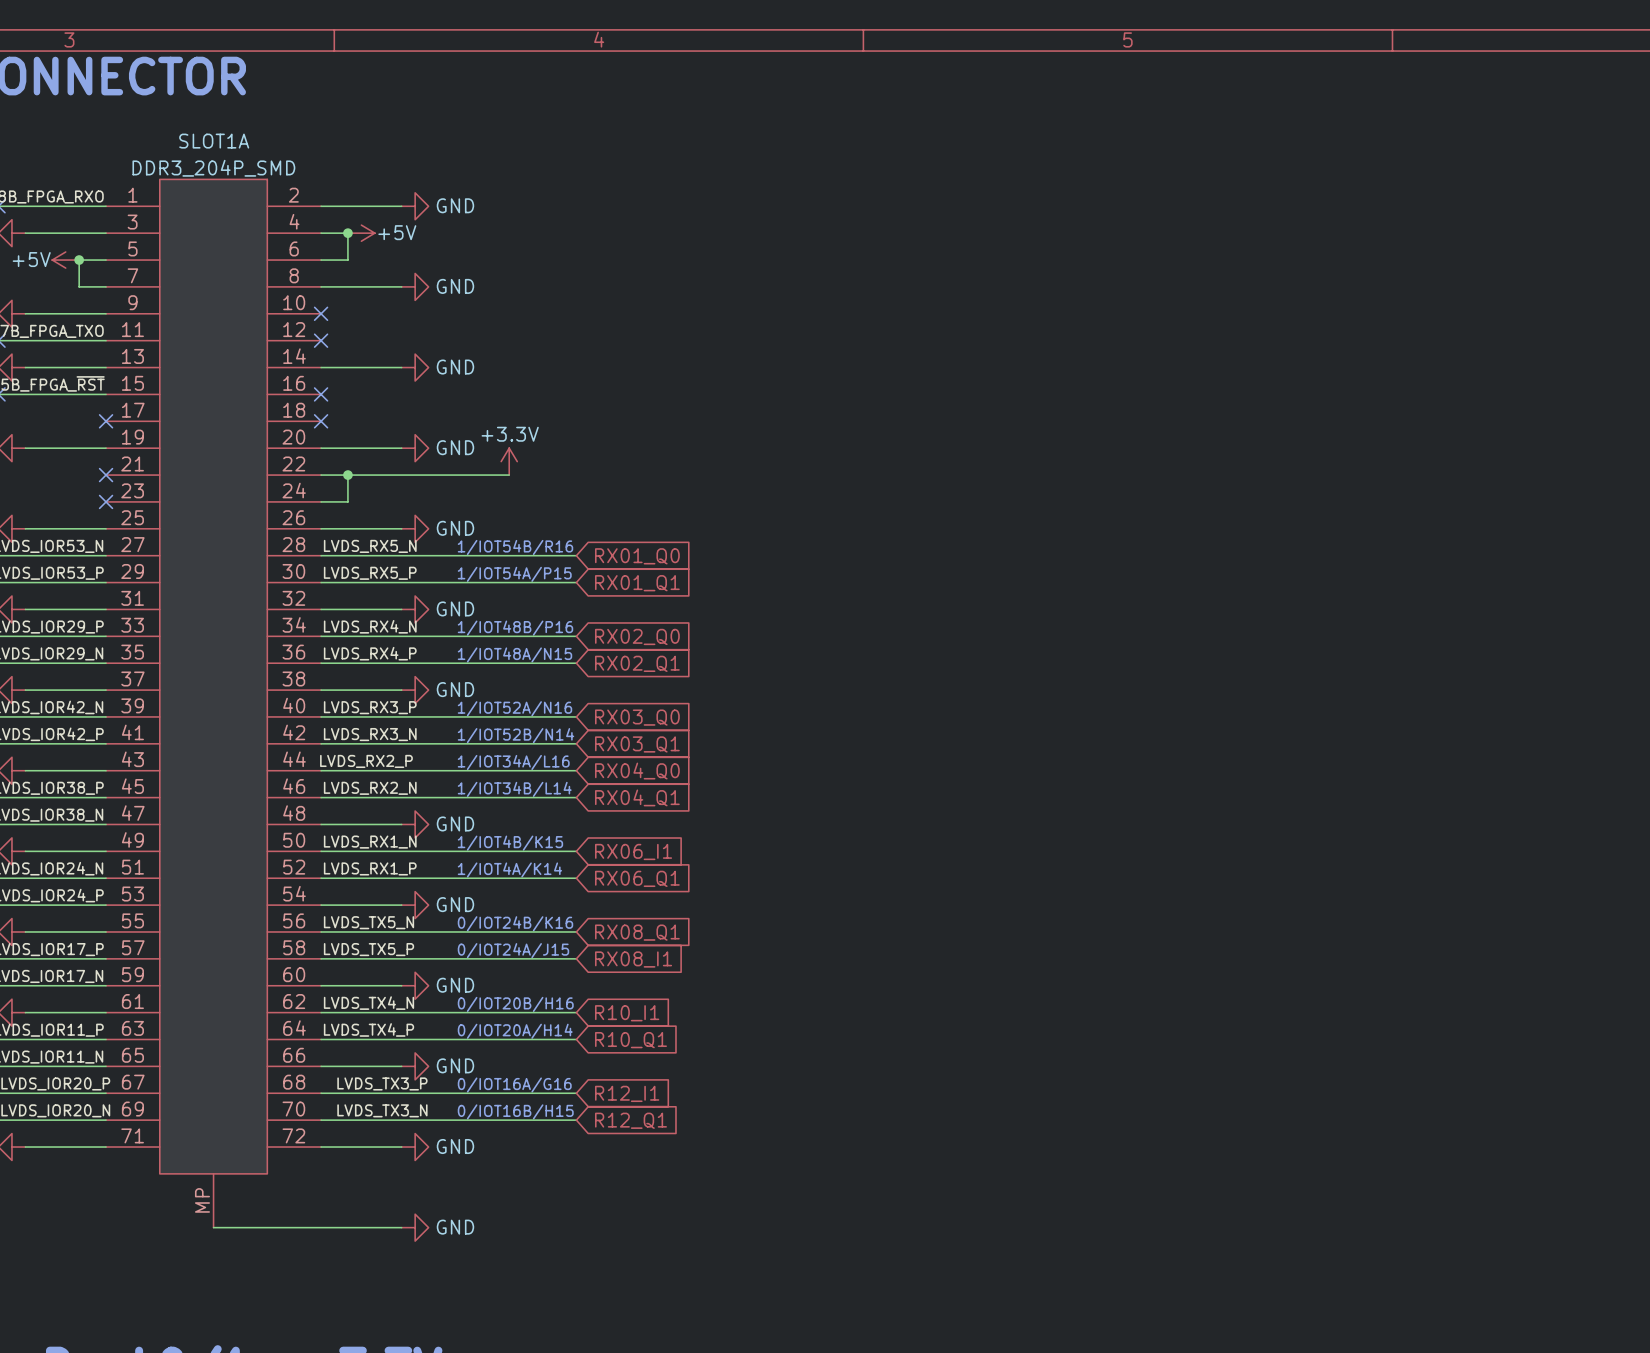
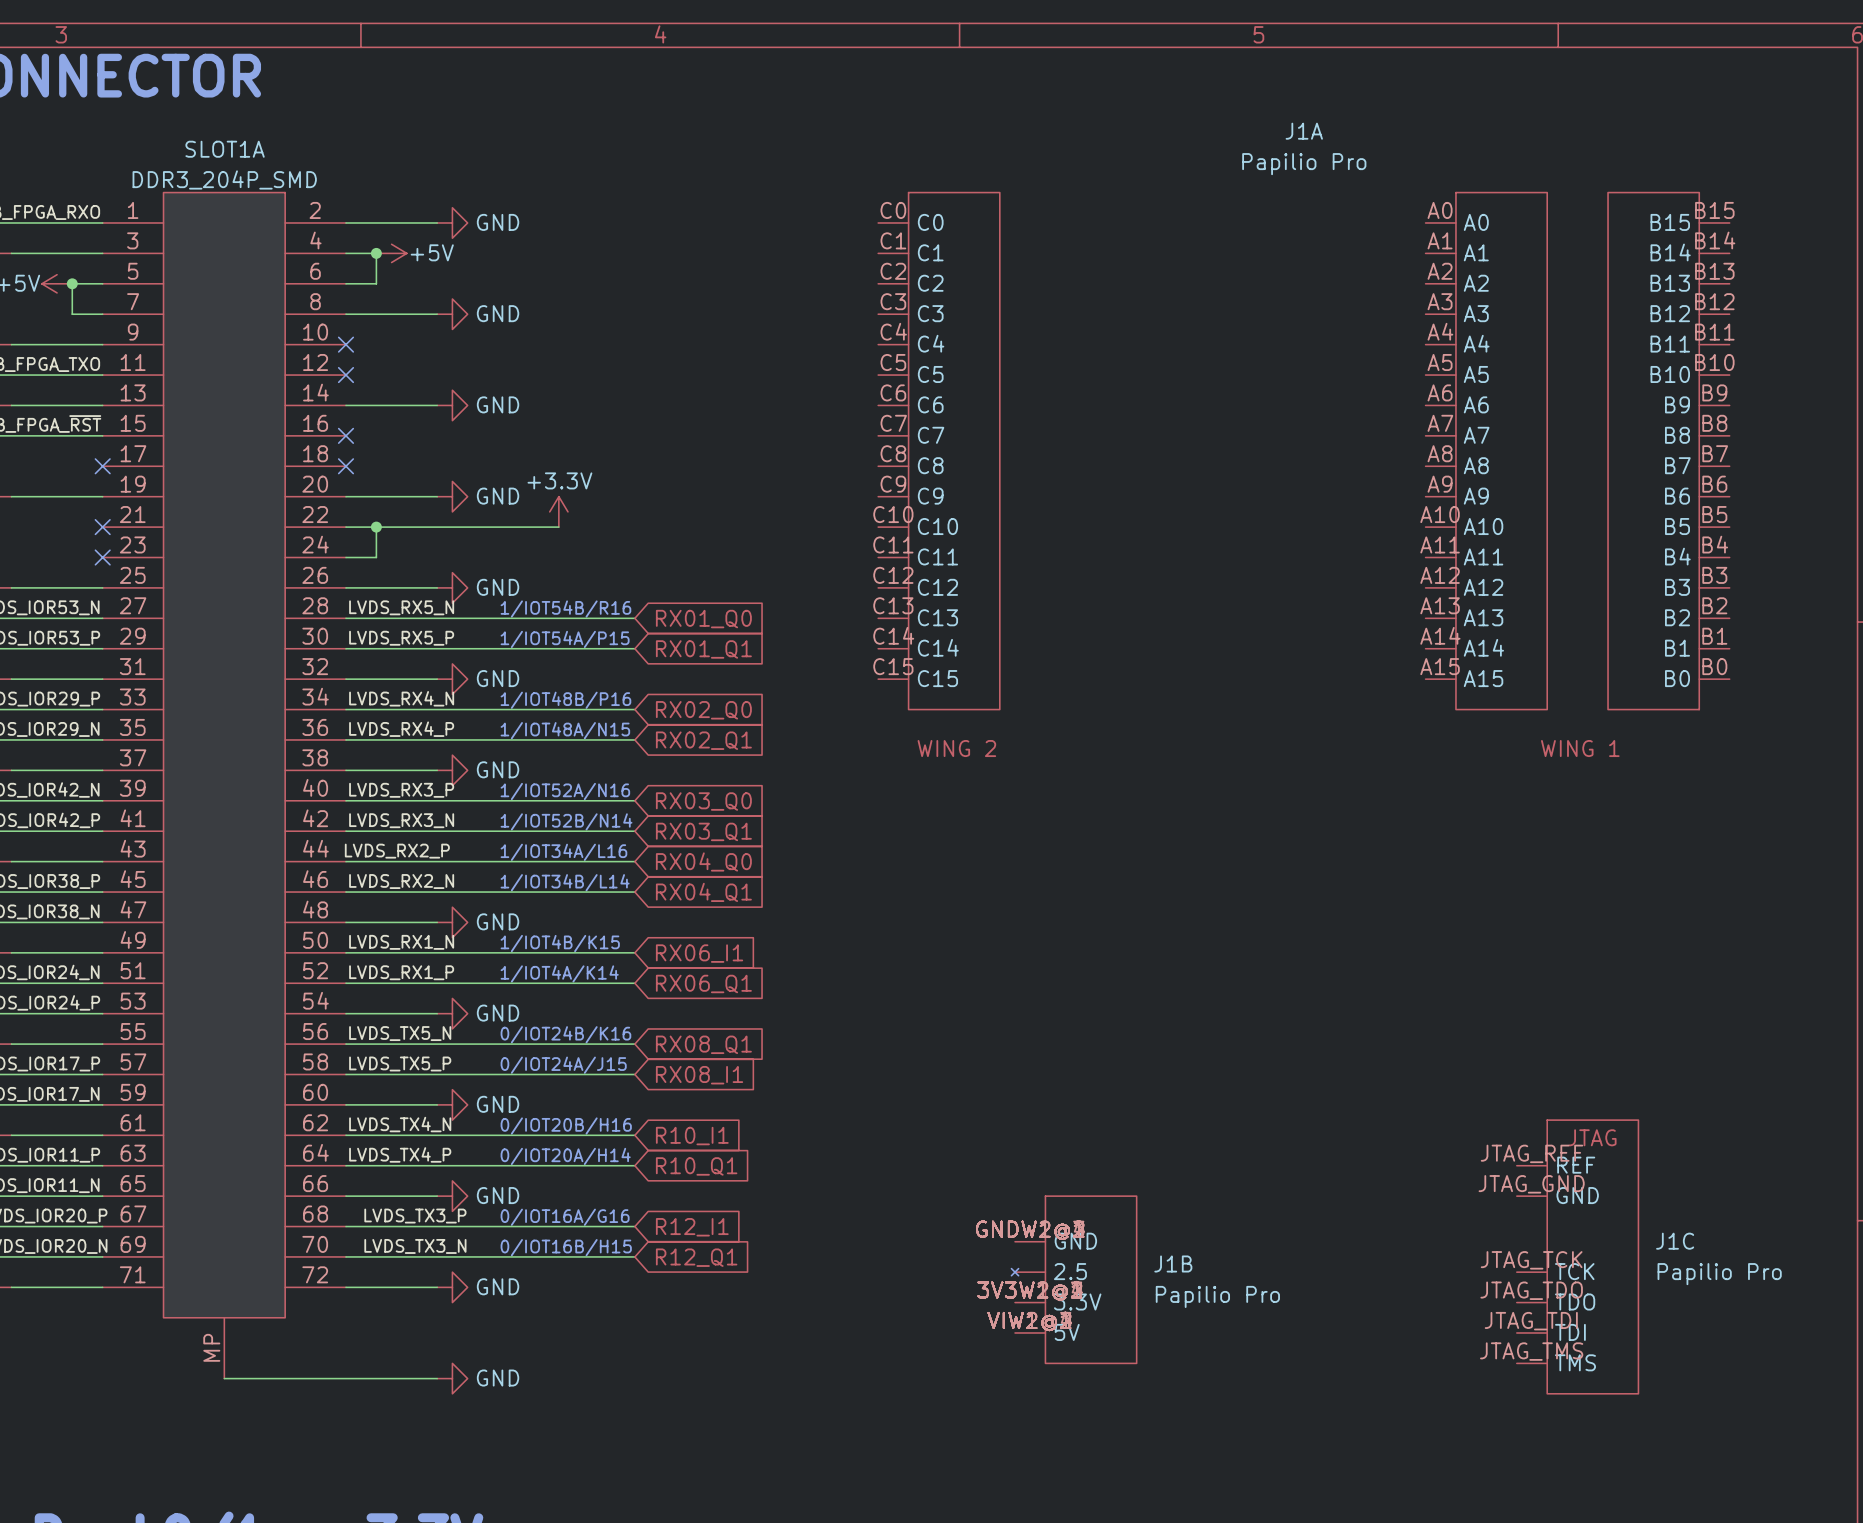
J1A: none -> Papilio Pro (1303, 451)
J1C: none -> Papilio Pro (1577, 1256)
J1B: none -> Papilio Pro (1074, 1279)

